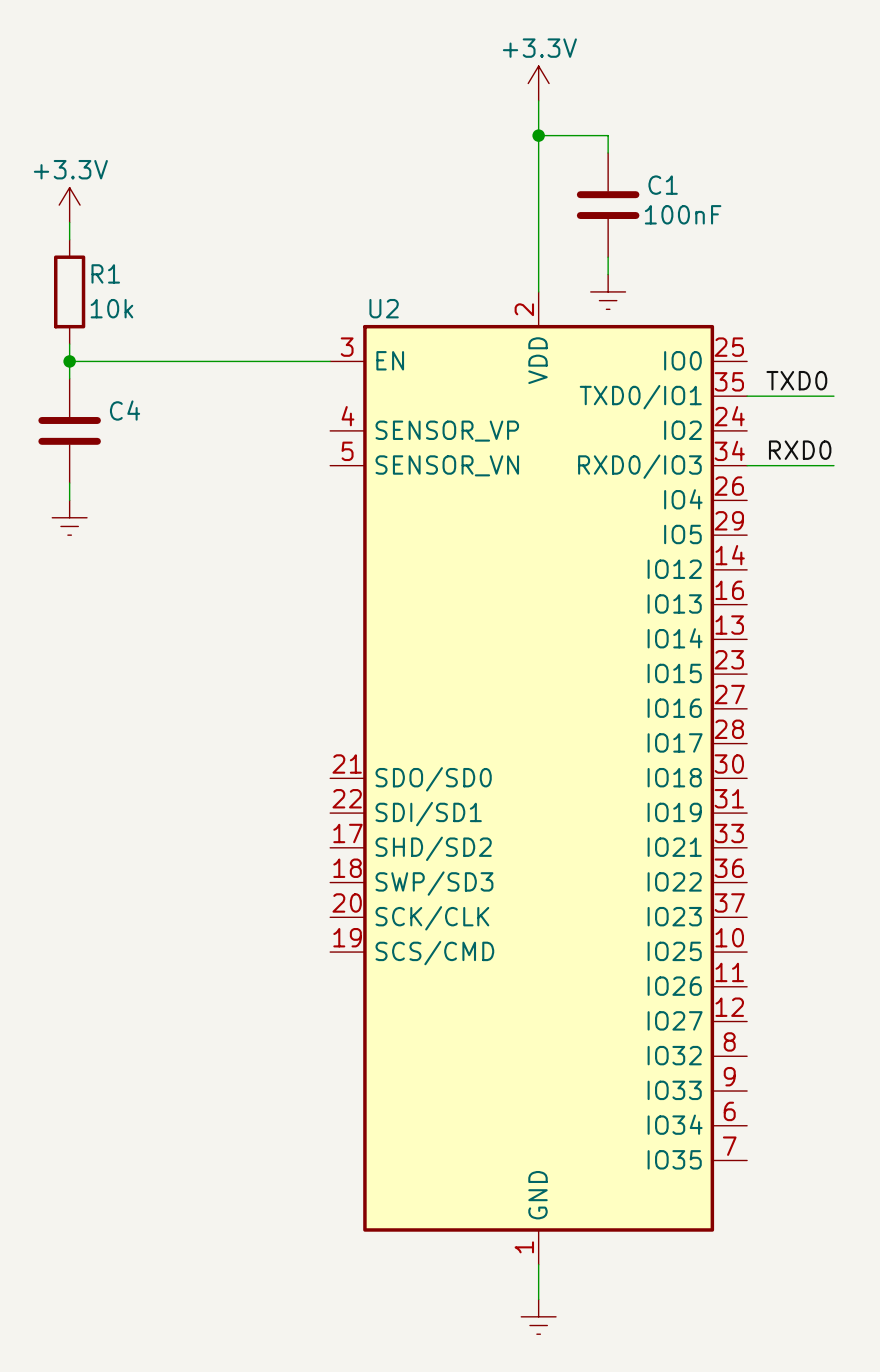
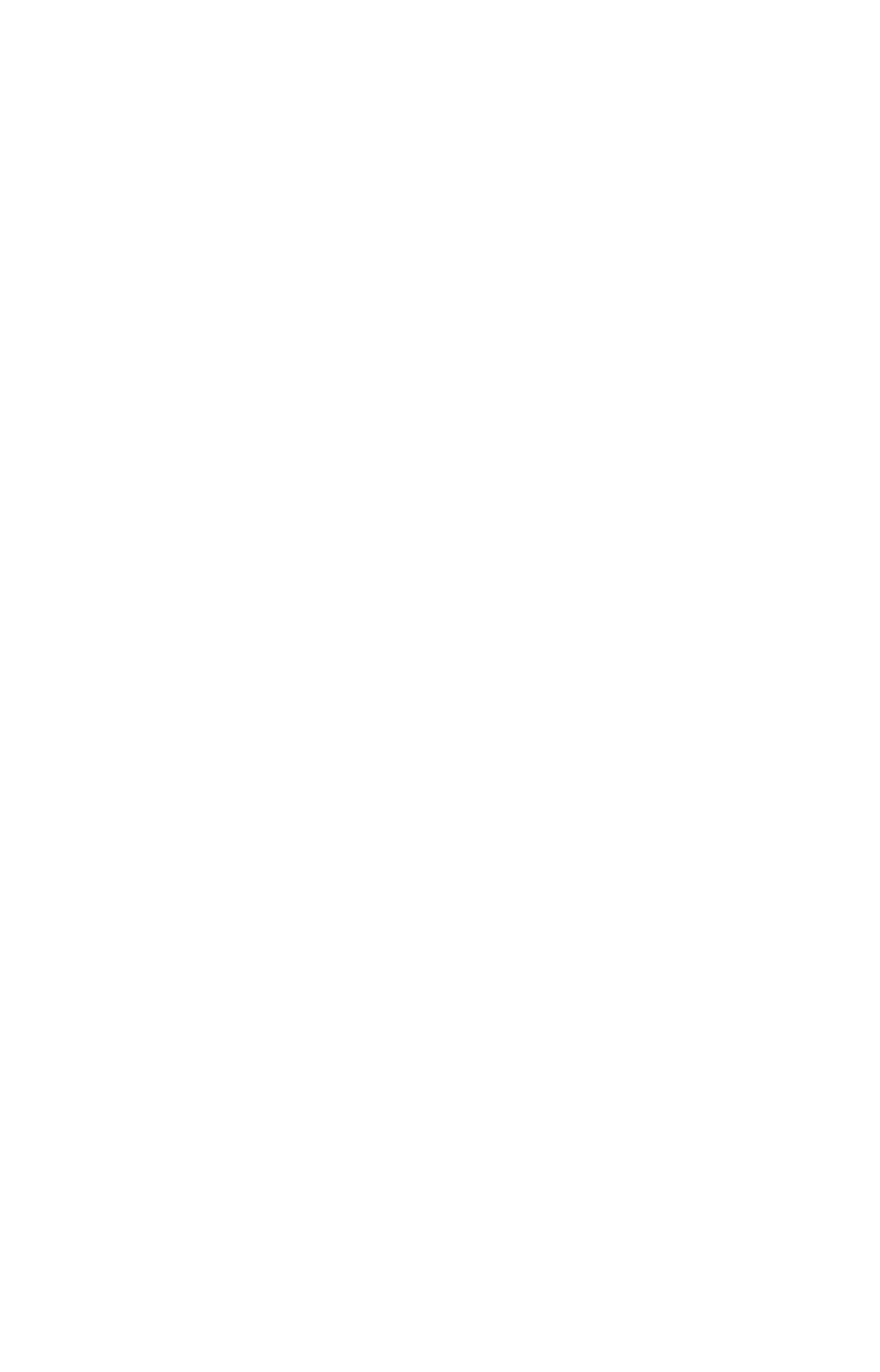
power symbol: +3.3V (538, 83) -> none
wire: (538, 100) (538, 291) -> none
wire: (538, 135) (608, 135) (608, 152) -> none
junction: (538, 135) -> none
power symbol: +3.3V (69, 205) -> none
C1: 100nF (608, 205) -> none
wire: (69, 222) (69, 239) -> none
wire: (608, 257) (608, 274) -> none
R1: 10k (69, 291) -> none
power symbol: (608, 291) -> none
wire: (69, 344) (69, 378) -> none
wire: (69, 361) (330, 361) -> none
junction: (69, 361) -> none
label: TXD0 (796, 380) -> none
wire: (747, 396) (833, 396) -> none
C4: (69, 430) -> none
label: RXD0 (800, 450) -> none
wire: (747, 465) (833, 465) -> none
wire: (69, 483) (69, 500) -> none
power symbol: (69, 517) -> none
U2: (538, 778) -> none
wire: (538, 1264) (538, 1299) -> none
power symbol: (538, 1316) -> none

